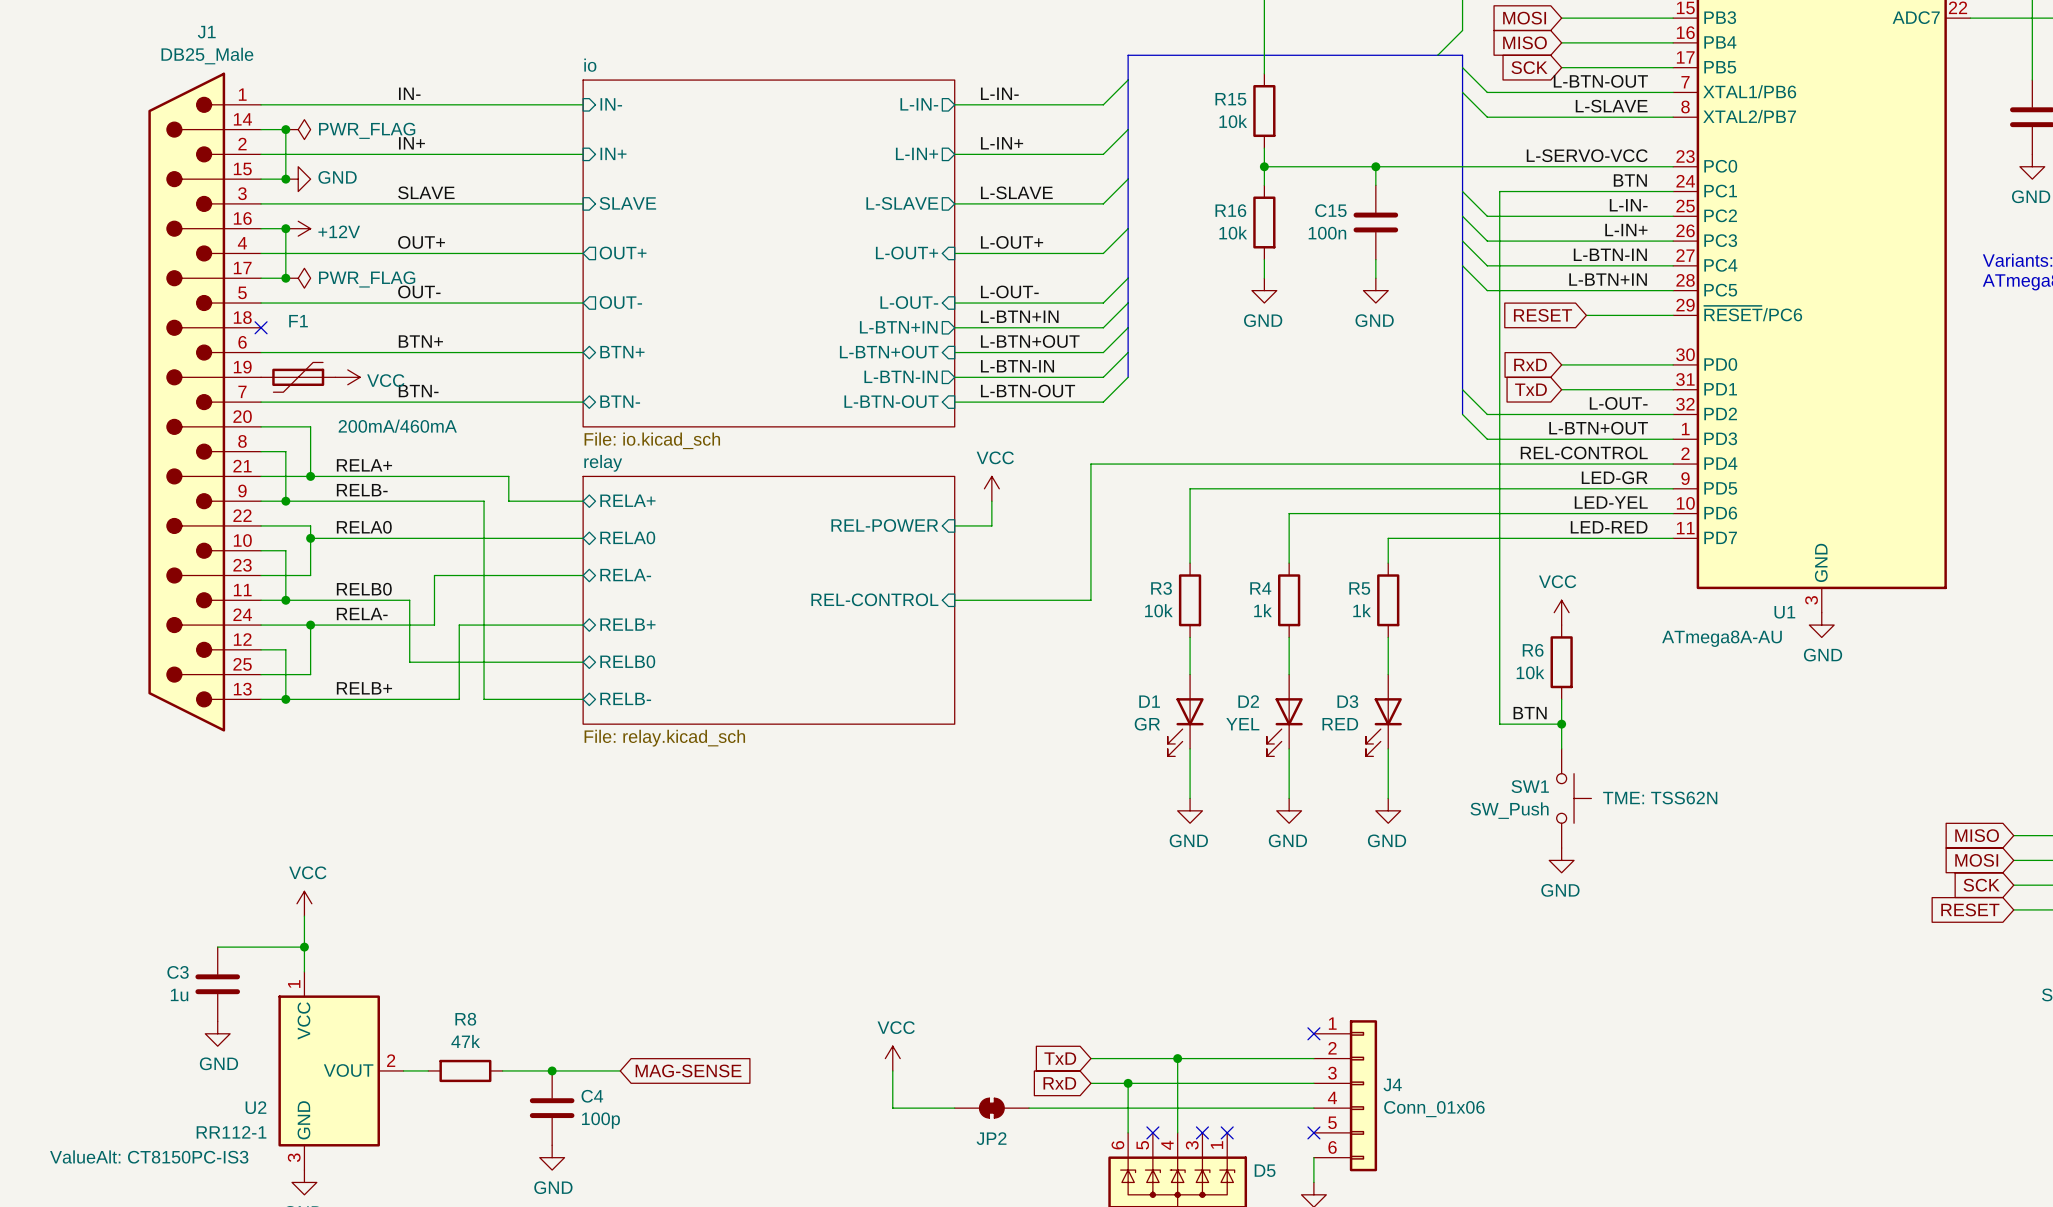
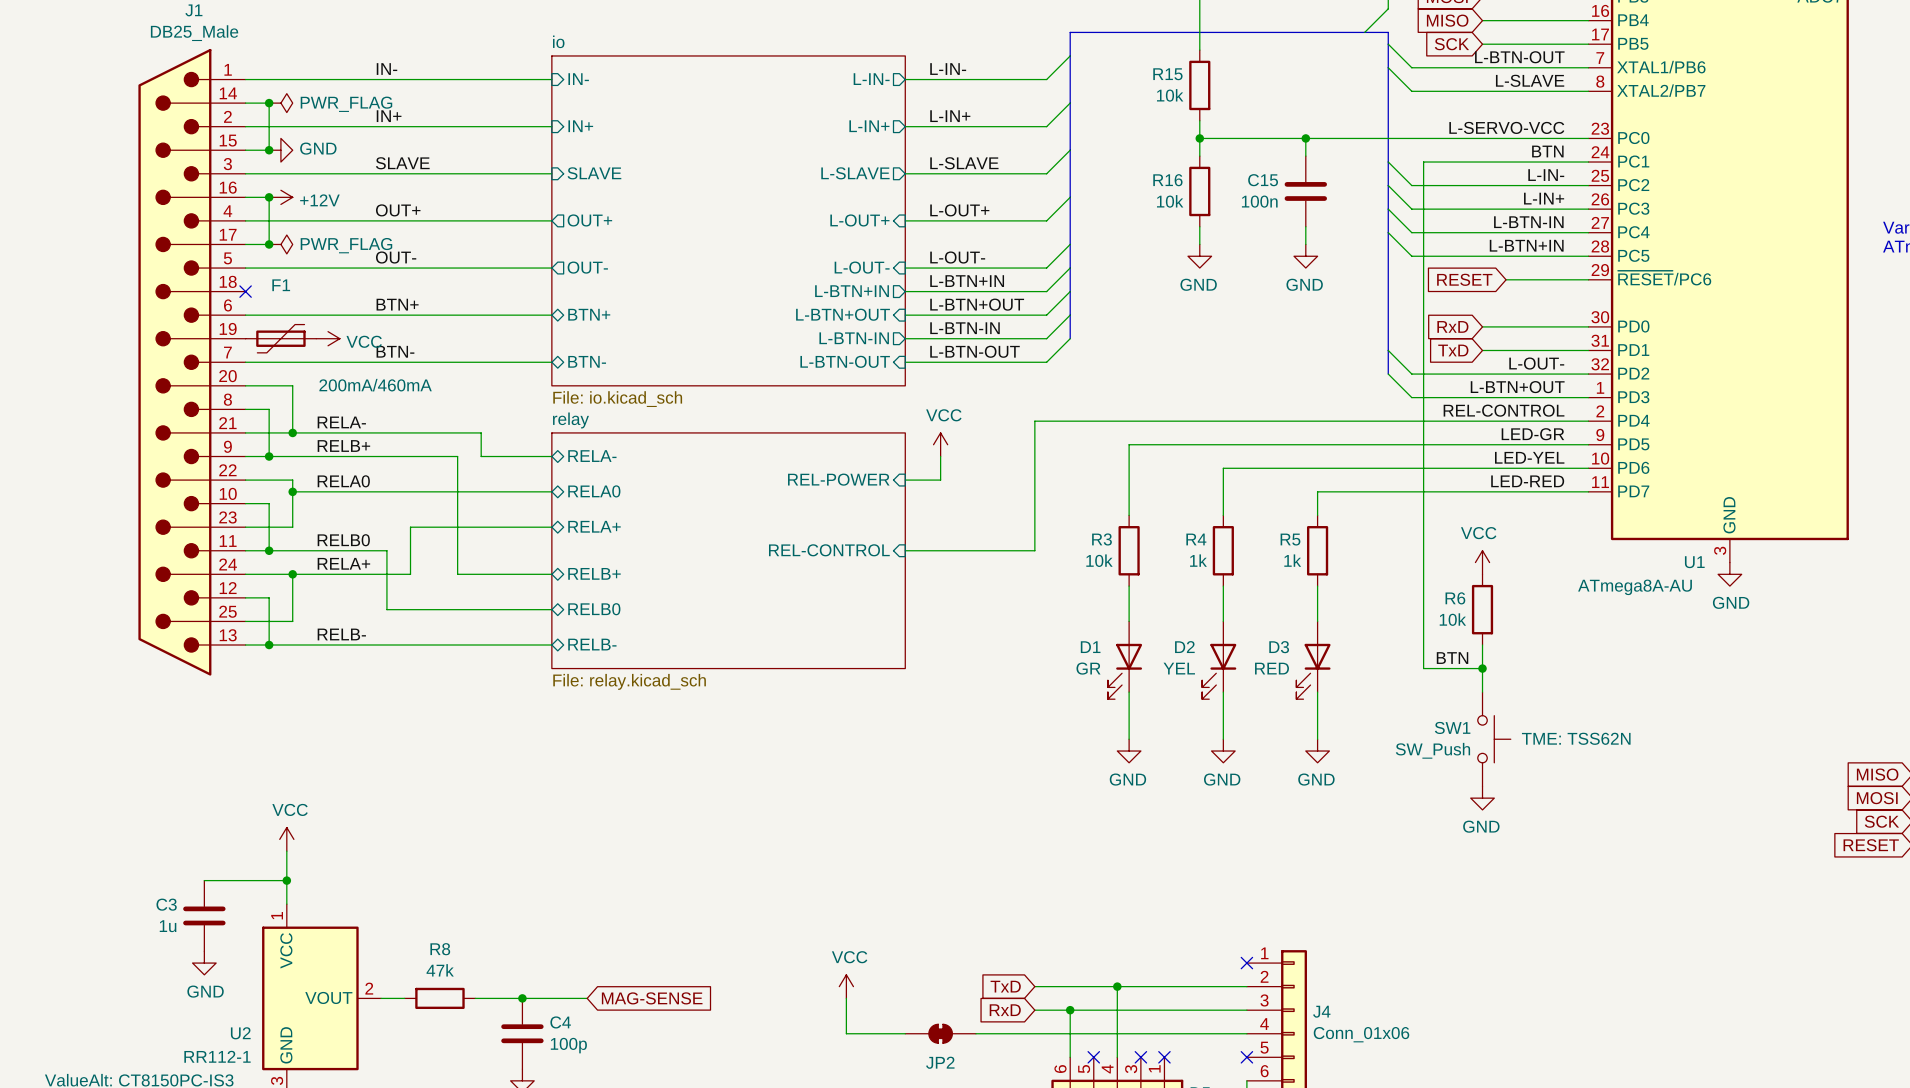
label: RELA+ (364, 465) -> RELA- (341, 422)
label: RELB- (362, 490) -> RELB+ (343, 446)
sheet pin: RELA+ (627, 500) -> RELA- (592, 456)
sheet pin: RELA- (625, 575) -> RELA+ (594, 526)
label: RELA- (362, 614) -> RELA+ (343, 563)
label: RELB+ (364, 688) -> RELB- (341, 634)
wire: (459, 699) (459, 625) (484, 625) (484, 699) -> (434, 644) (457, 644)

